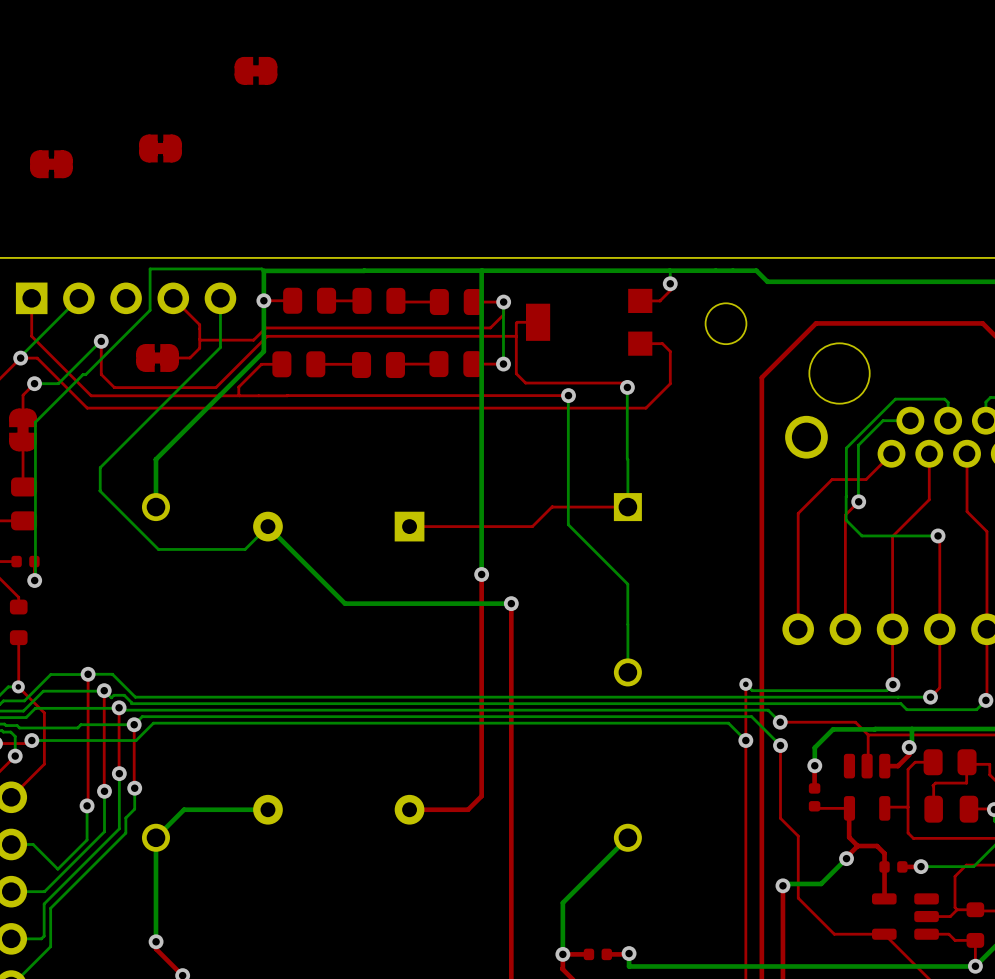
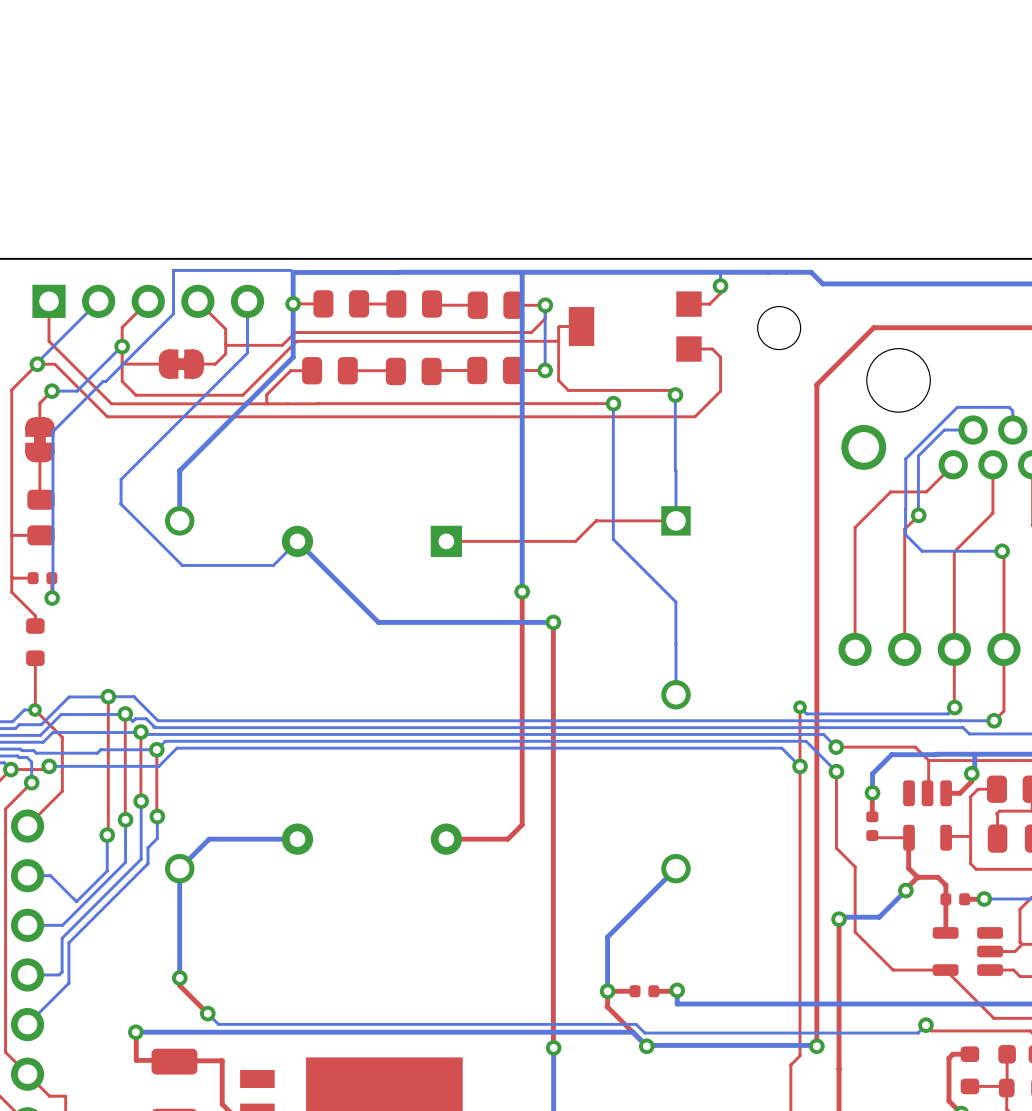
part: (255, 70) -> none
part: (160, 148) -> none
part: (51, 164) -> none
top track: none -> (148, 301) (122, 327) (122, 346)
top track: none -> (168, 364) (122, 364)

